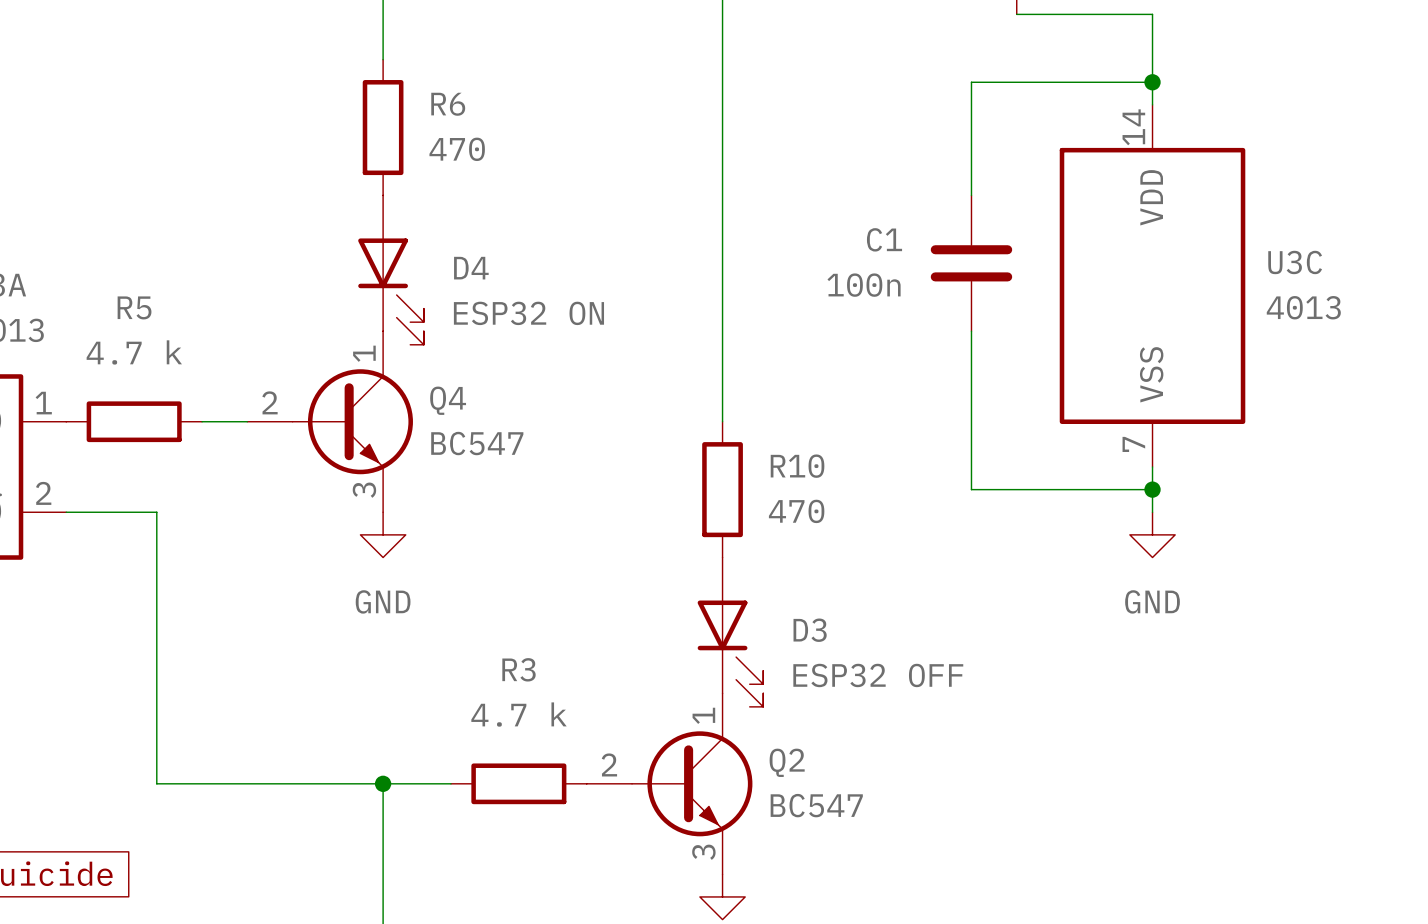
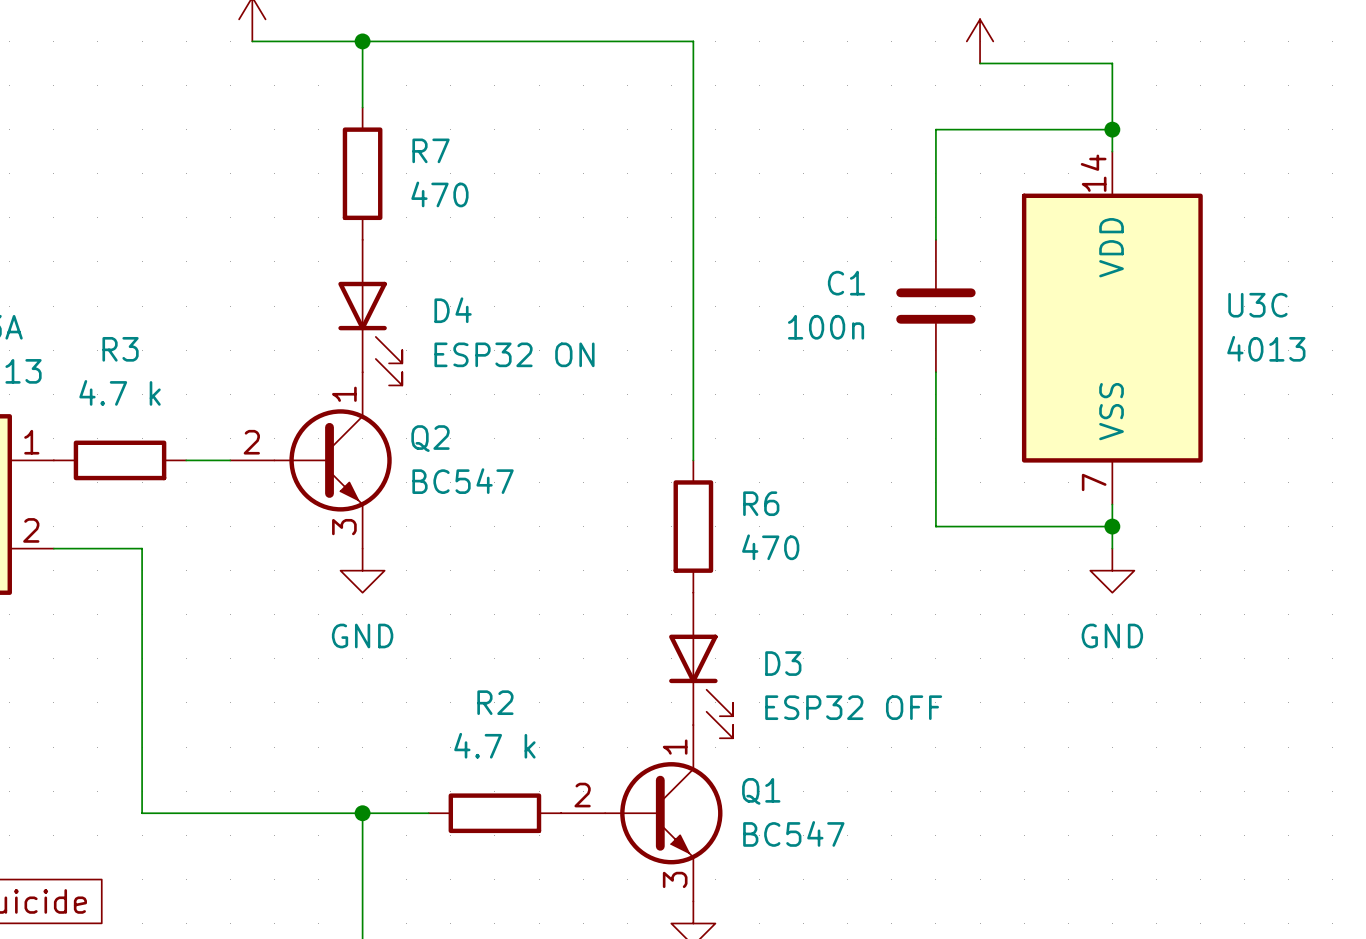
R6 name: R6 (448, 104) -> R7 (431, 150)
R5 name: R5 (134, 307) -> R3 (120, 349)
Q4 name: Q4 (448, 400) -> Q2 (430, 438)
R10 name: R10 (797, 466) -> R6 (761, 503)
R3 name: R3 (519, 669) -> R2 (495, 702)
Q2 name: Q2 (787, 762) -> Q1 (761, 791)

